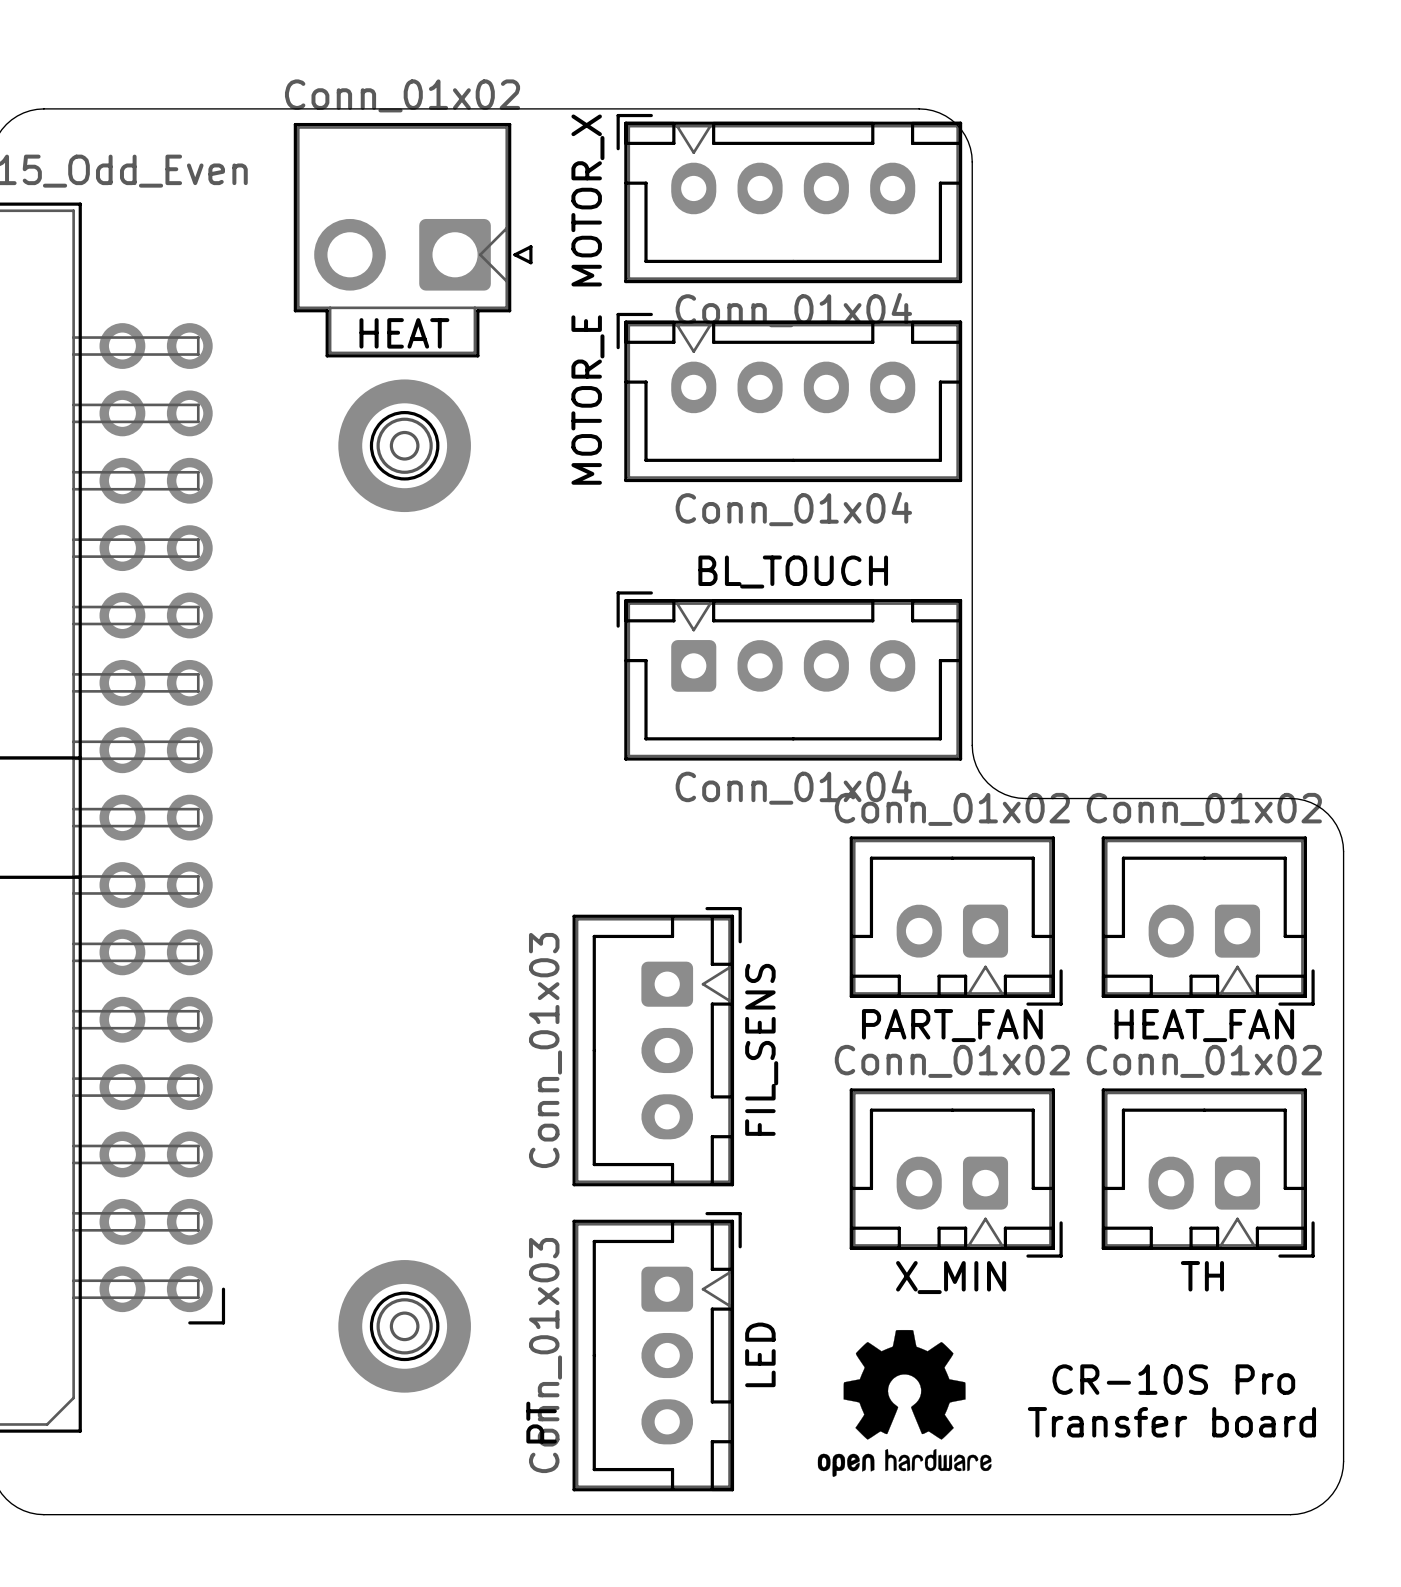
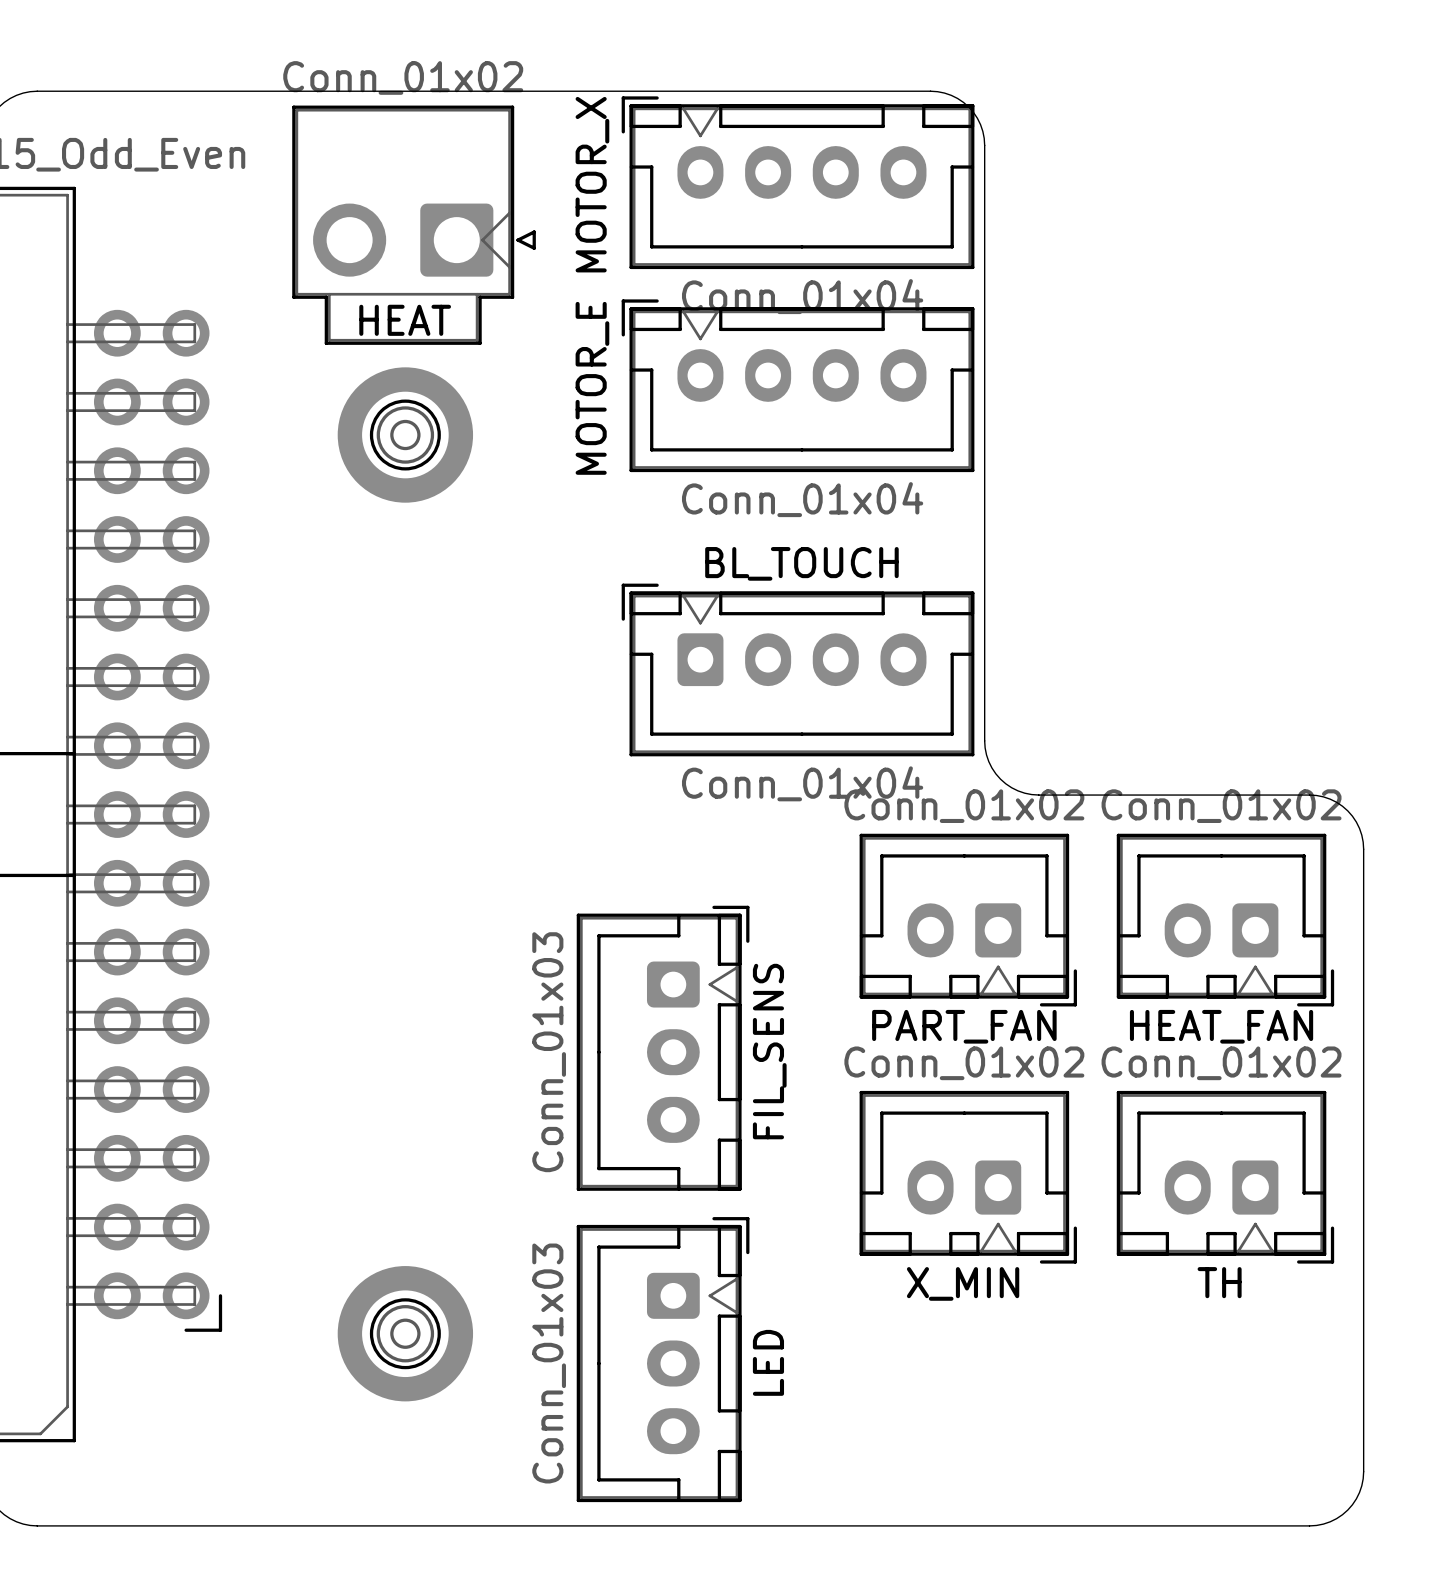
drawing: [817, 1329, 992, 1477] -> none
text: CR-10S Pro (1173, 1379) -> none
text: PT (541, 1422) -> none
text: Transfer board (1171, 1422) -> none

